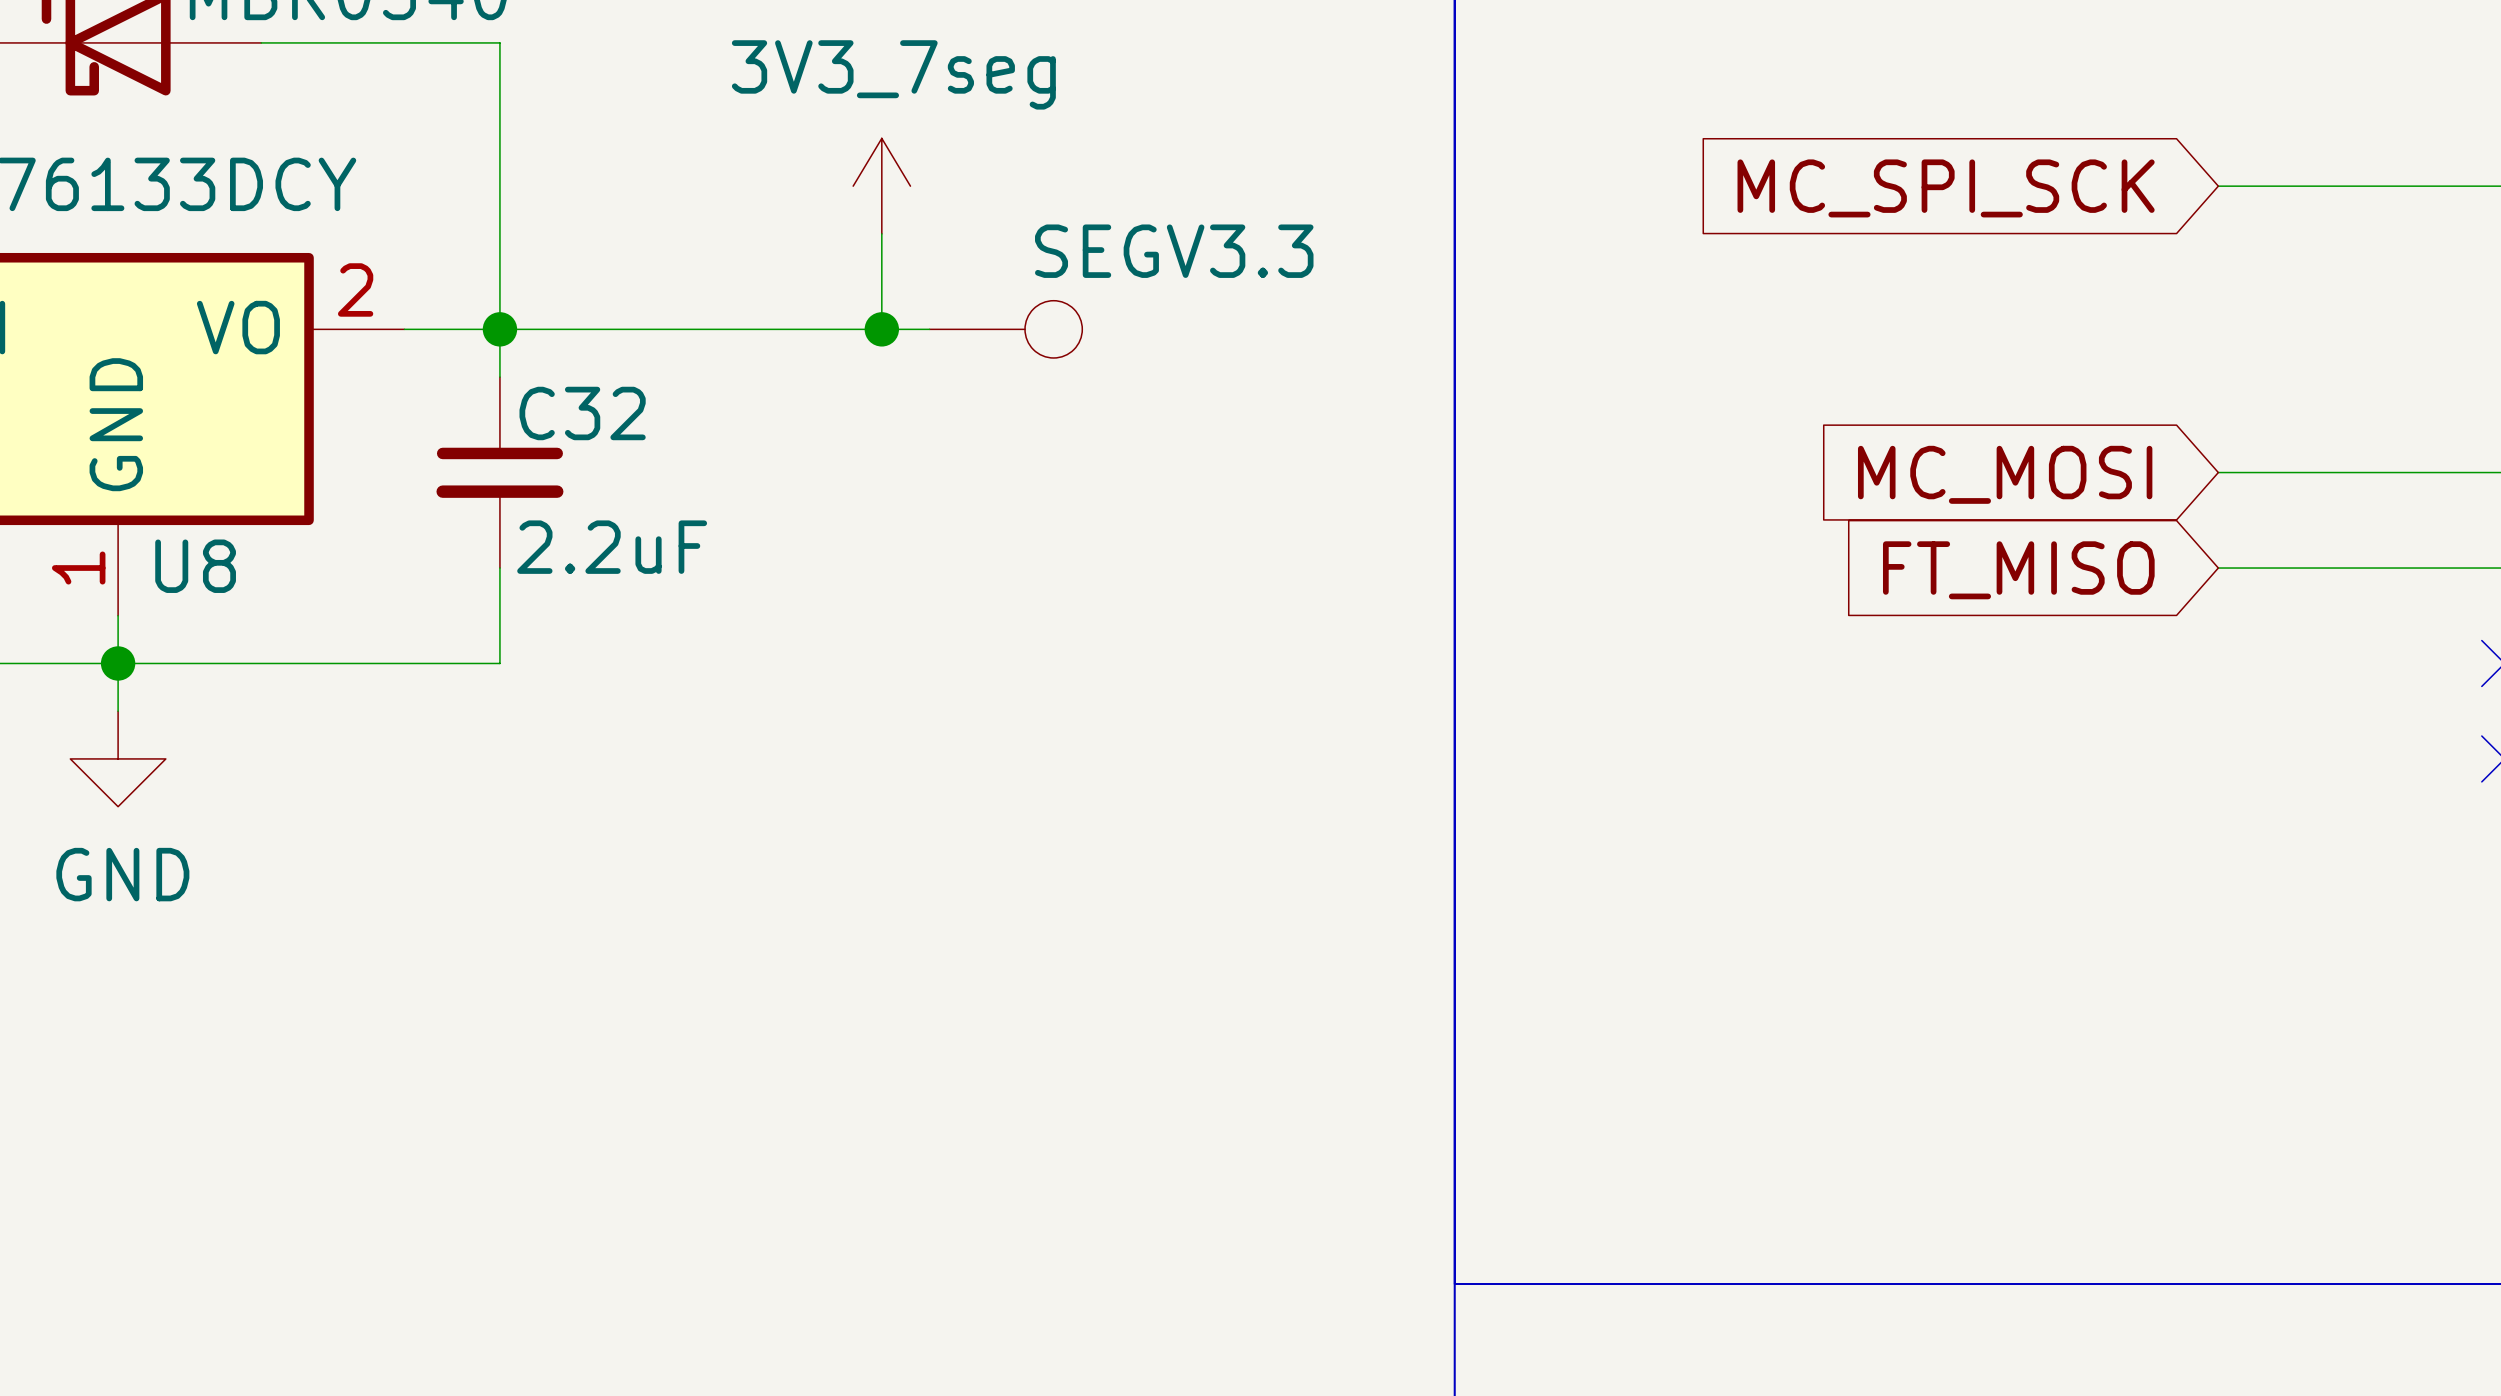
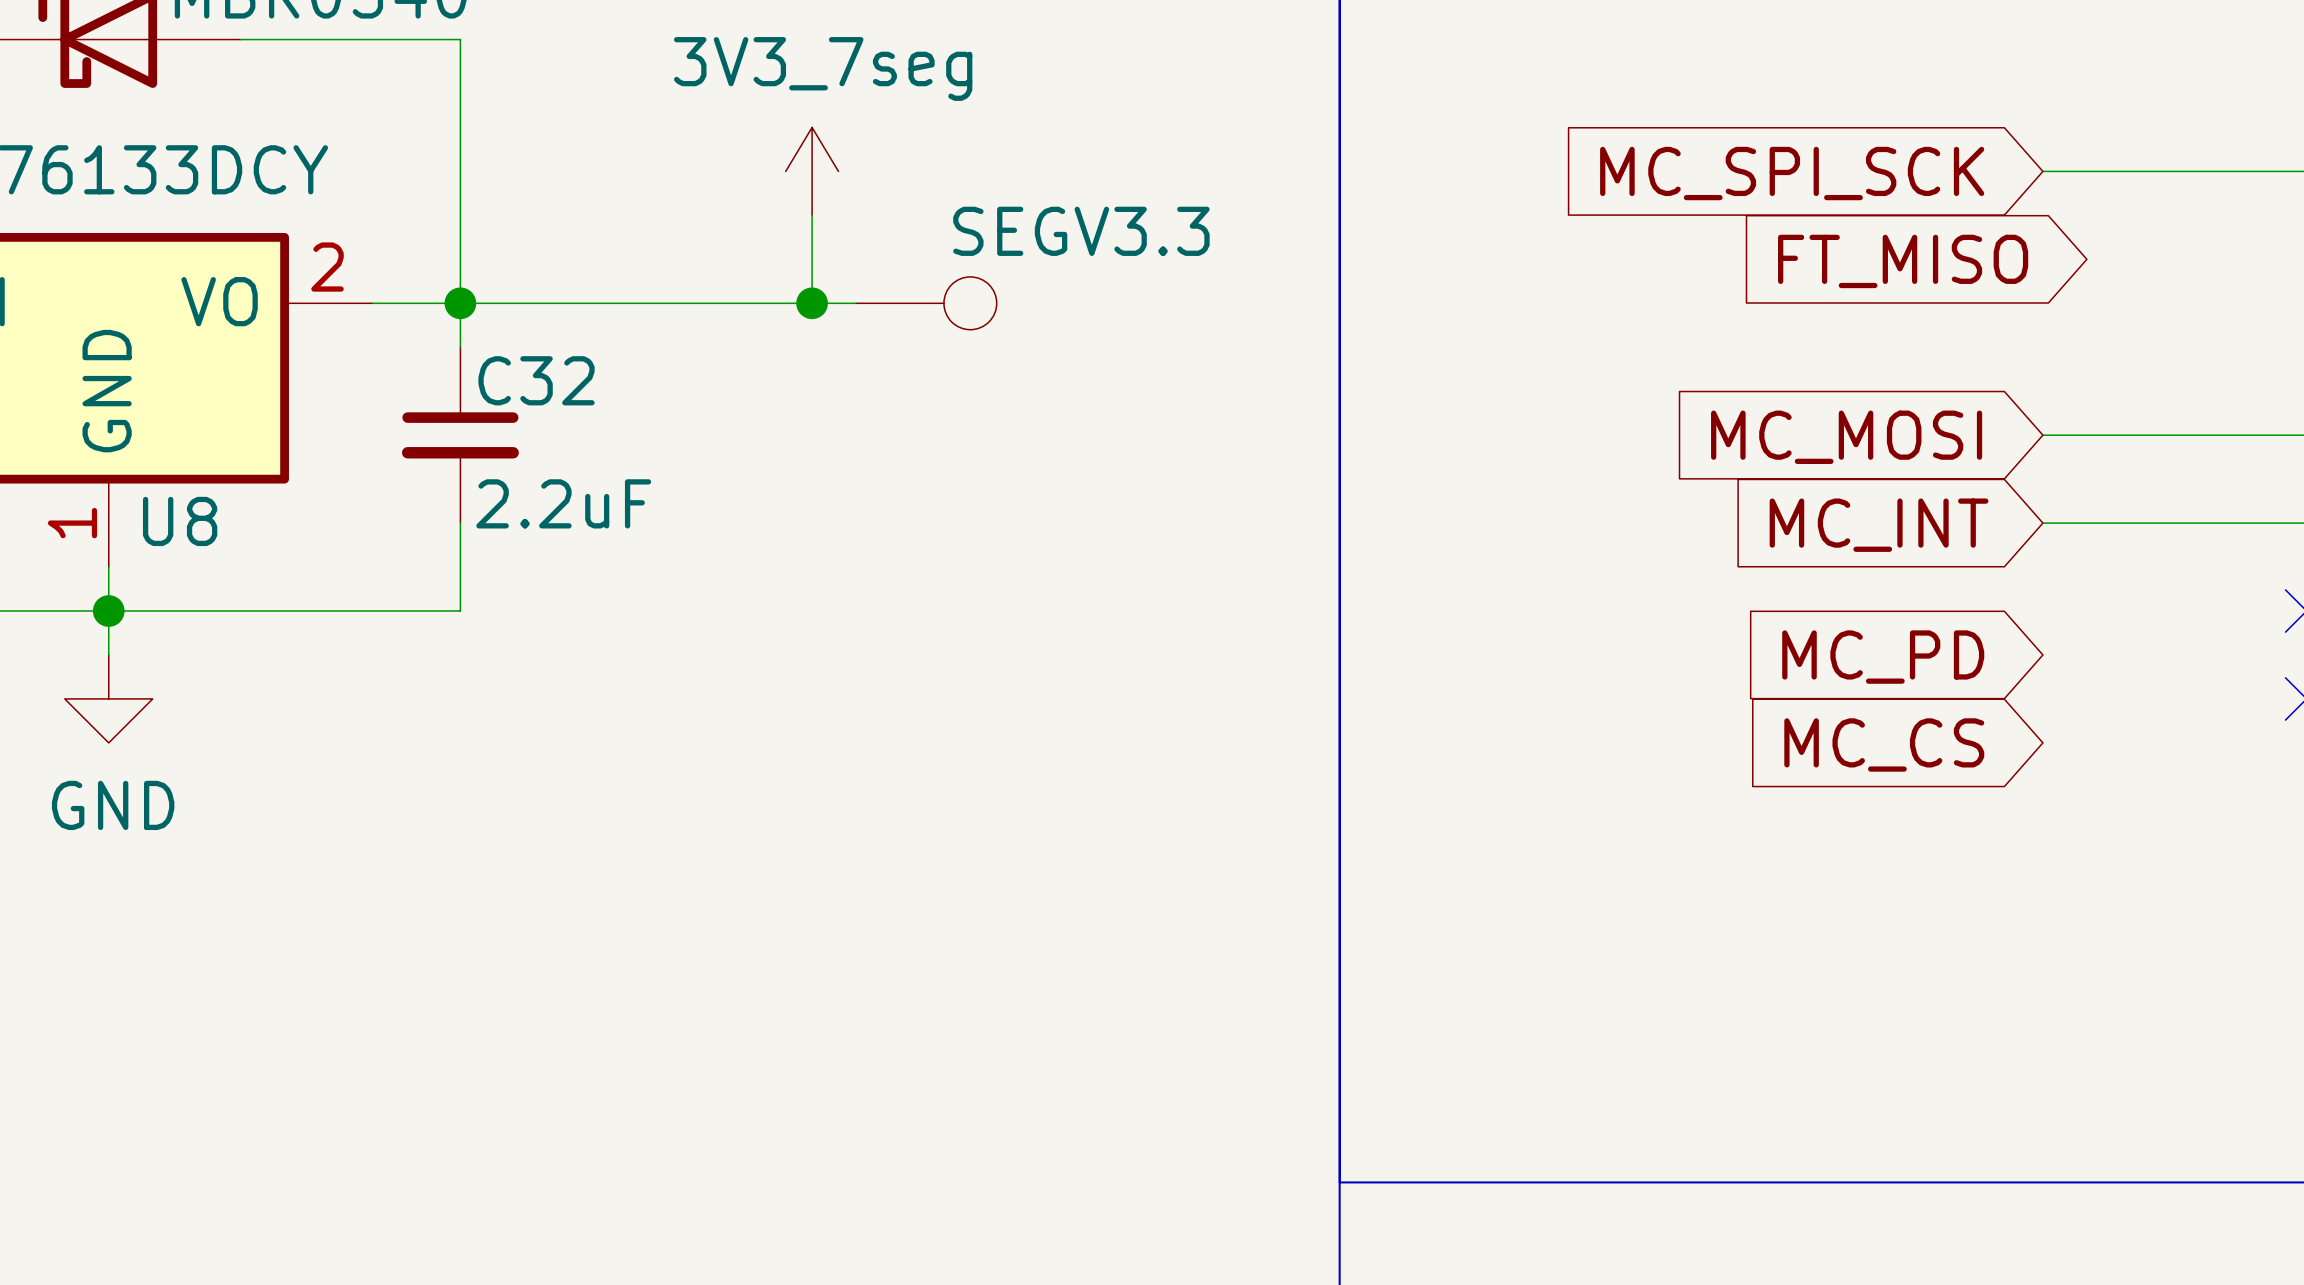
global label: none -> FT_MISO (1903, 261)
global label: FT_MISO (2018, 570) -> MC_INT (1879, 525)
global label: none -> MC_PD (1883, 657)
global label: none -> MC_CS (1884, 744)

